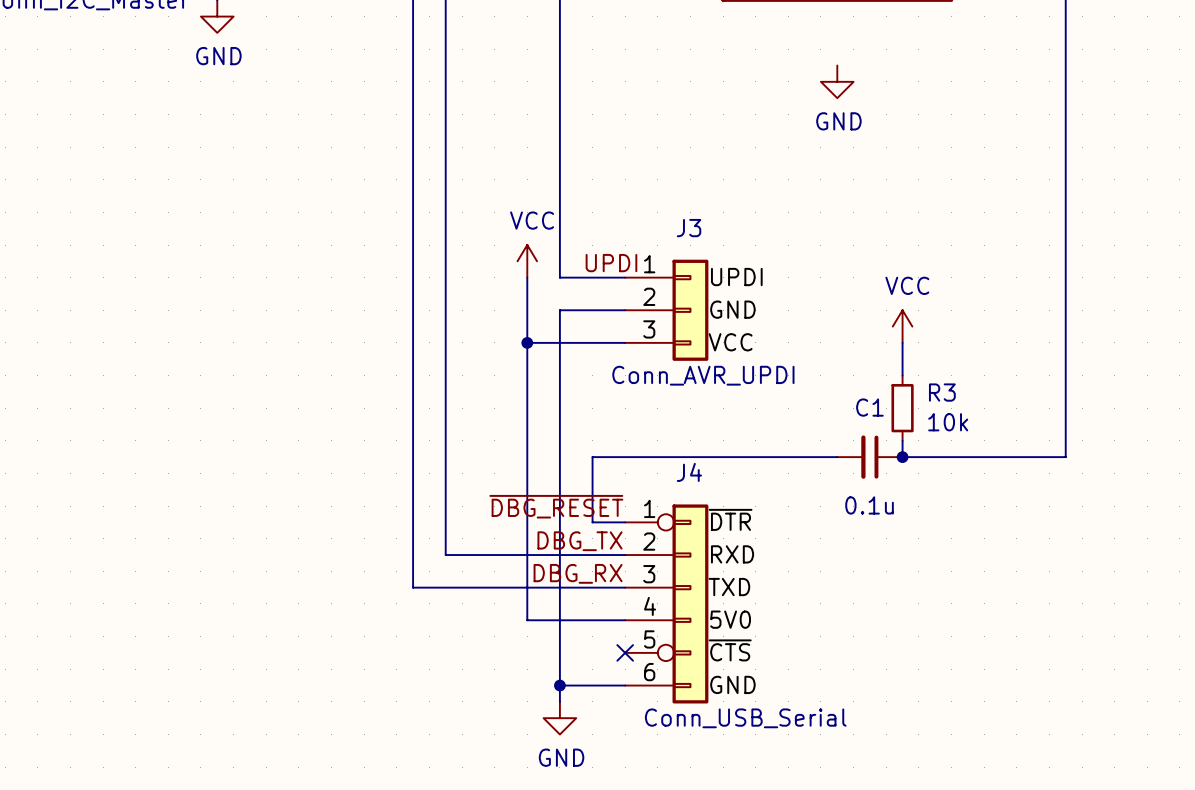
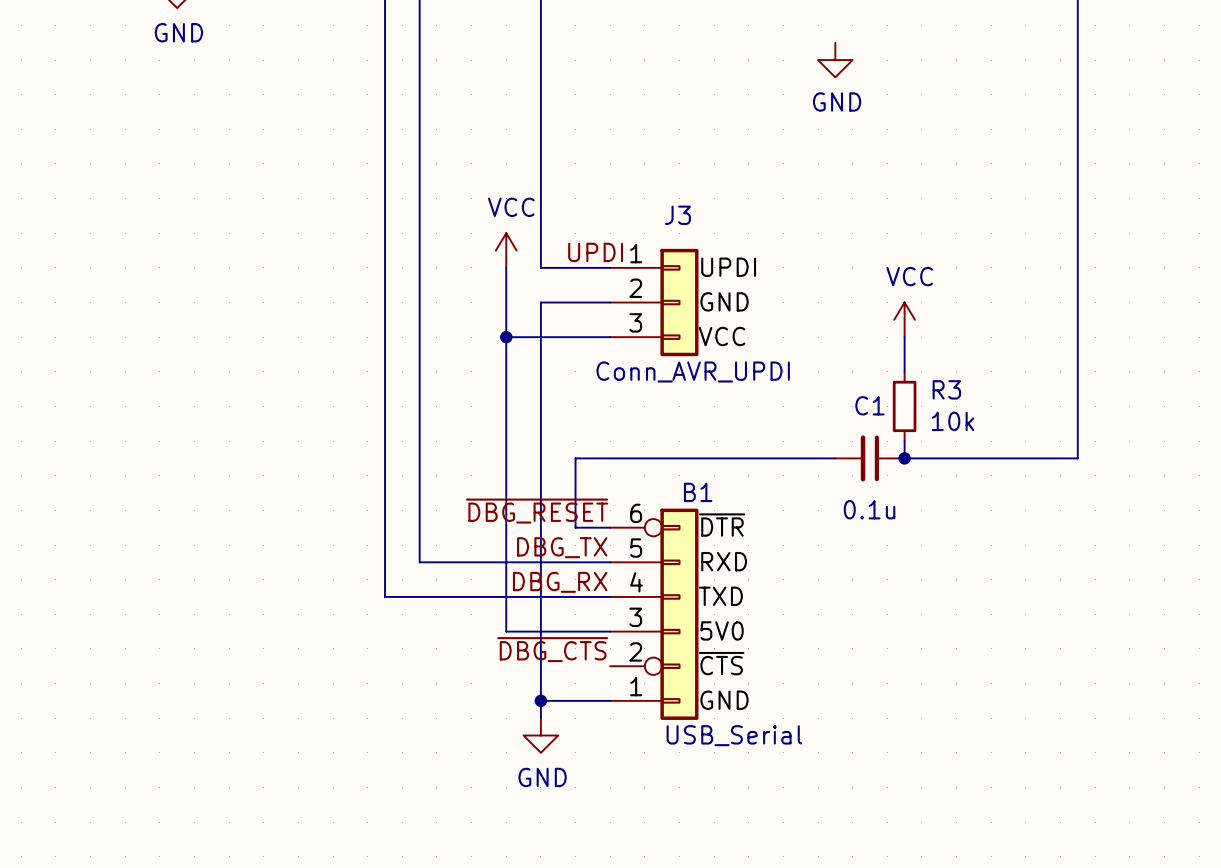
J4 name: J4 (689, 472) -> B1 (698, 492)
J4 pin number: 1 (649, 508) -> 6 (636, 513)
J4 pin number: 2 (649, 541) -> 5 (636, 548)
J4 pin number: 3 (649, 574) -> 4 (636, 582)
J4 pin number: 4 (650, 606) -> 3 (635, 617)
label: none -> ~{DBG_CTS} (552, 649)
J4 pin number: 5 (649, 639) -> 2 (635, 651)
no-connect mark: (625, 652) -> none
J4 pin number: 6 (649, 672) -> 1 (636, 686)
J4 value: Conn_USB_Serial (745, 718) -> USB_Serial (734, 735)

